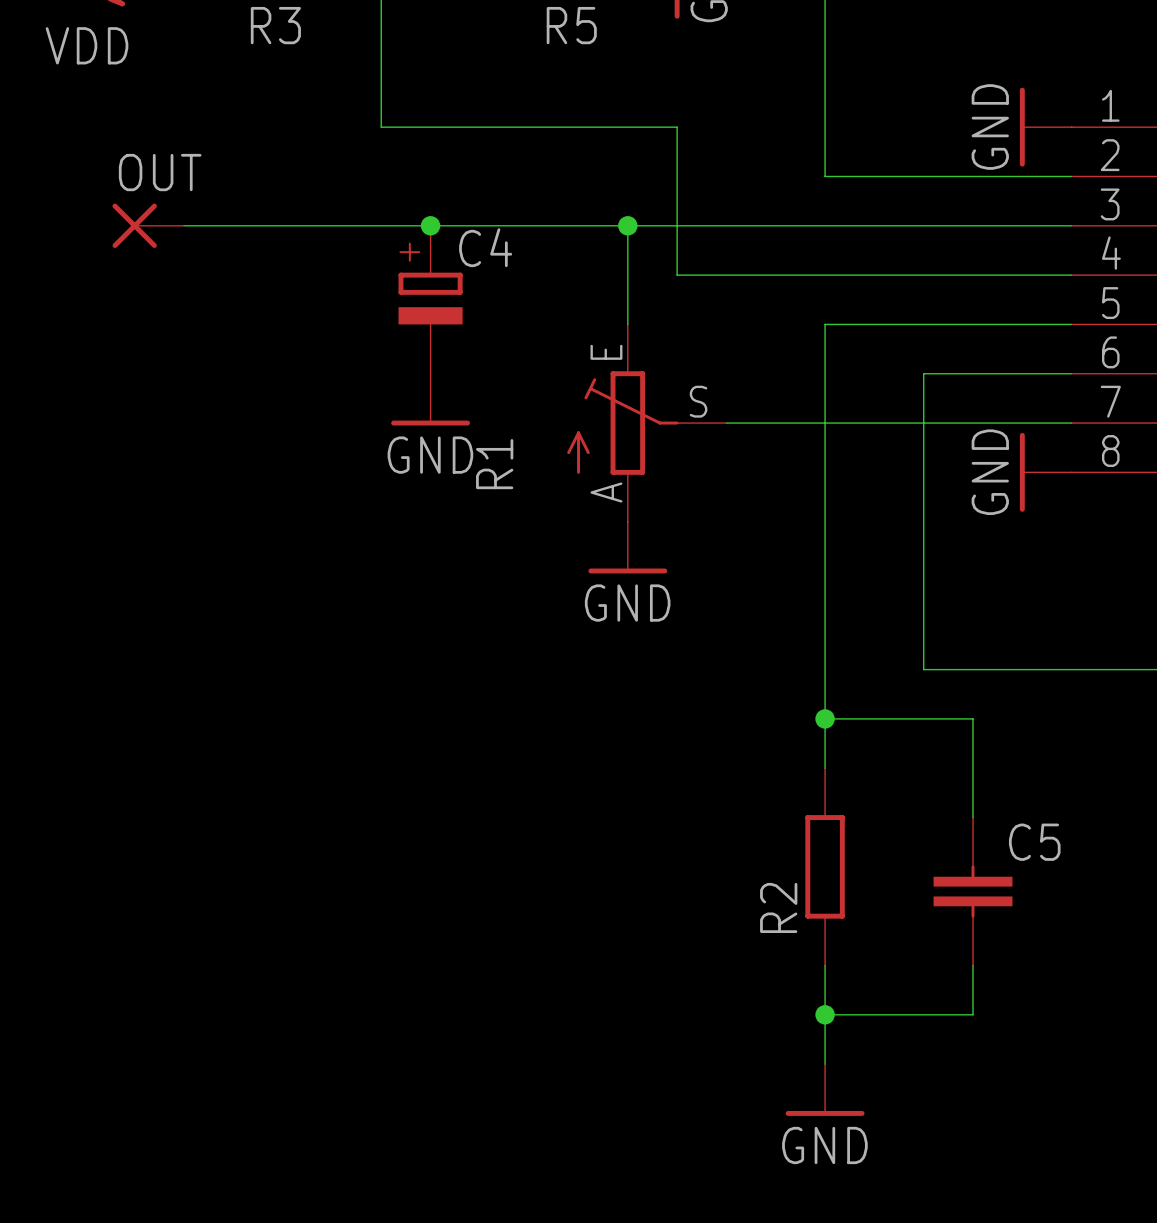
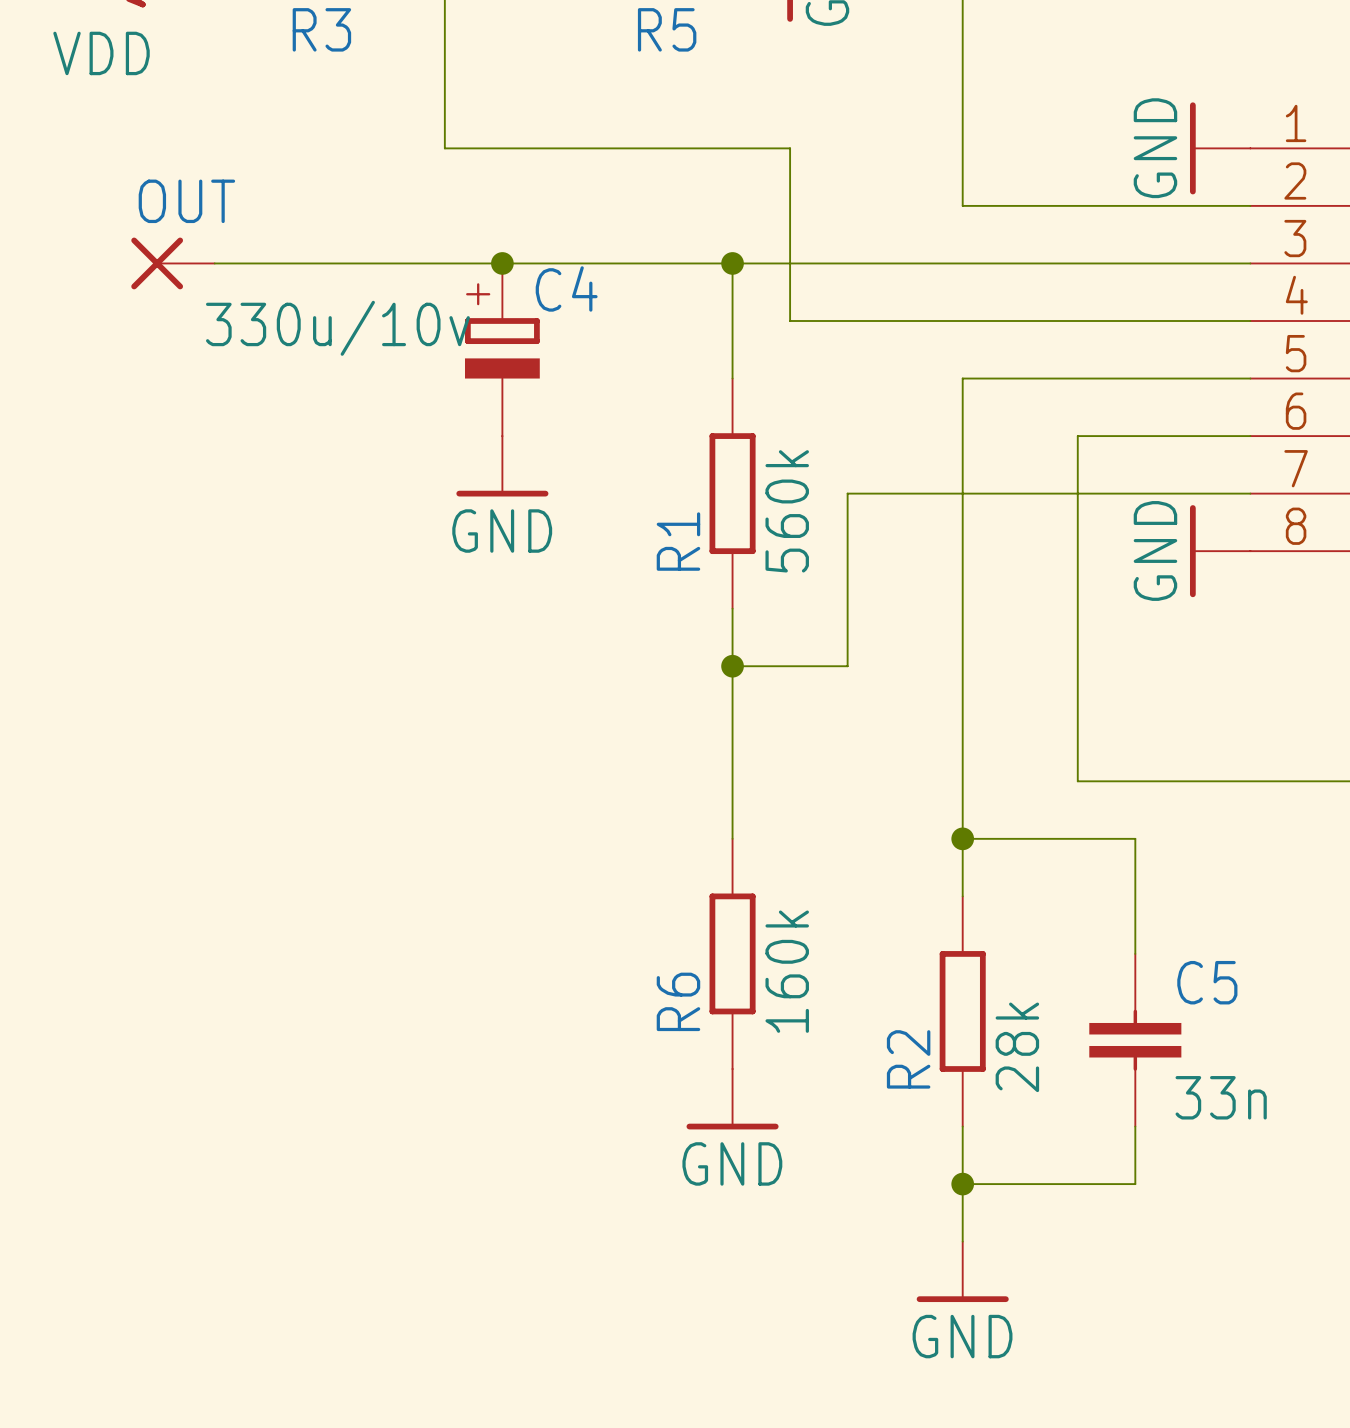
C4 value: none -> 330u/10v (337, 328)
R1 symbol: [567, 324, 727, 522] -> [709, 378, 756, 609]
wire: none -> (847, 493) (847, 666) (732, 666)
R1 value: none -> 560k (787, 511)
R1 name position: R1 (494, 464) -> R1 (678, 541)
wire: none -> (732, 608) (732, 838)
power symbol position: GND (627, 547) -> GND (732, 1099)
junction: none -> (732, 666)
R6: none -> 160k (732, 953)
R2 value: none -> 28k (1017, 1047)
C5 value: none -> 33n (1221, 1097)

